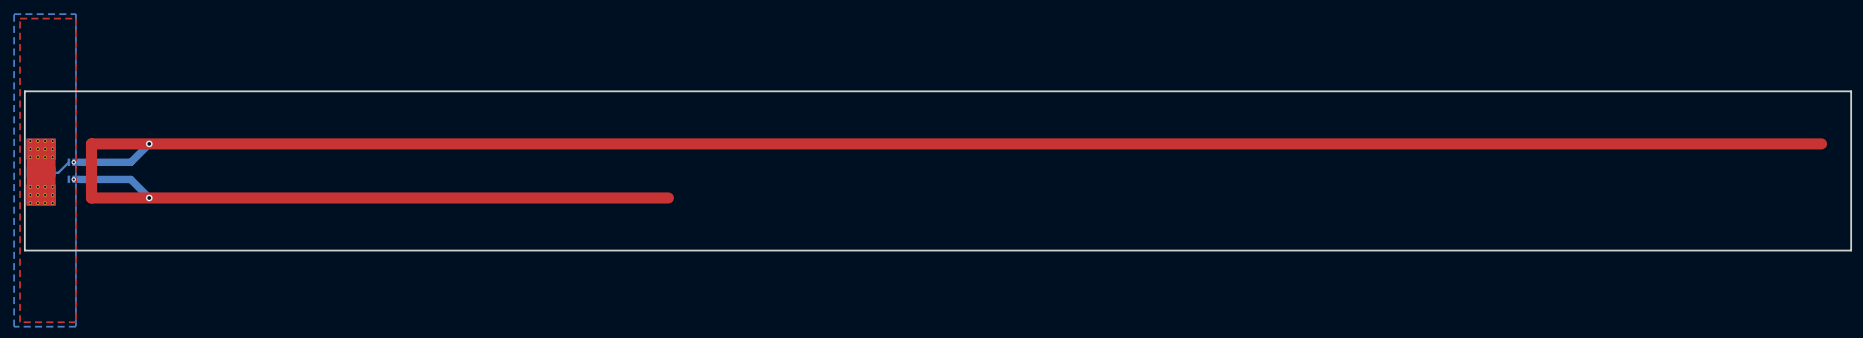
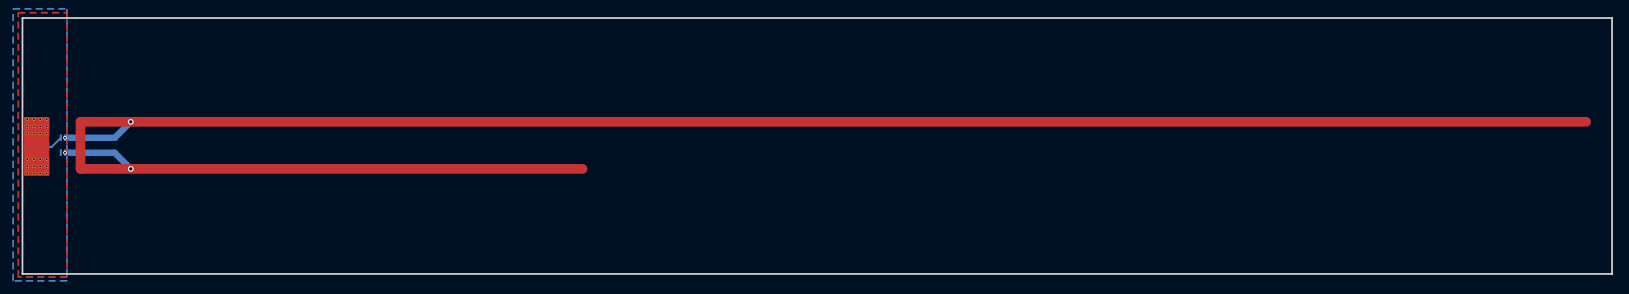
board edge: (24, 91) (1851, 91) -> (22, 76) (22, 18) (1612, 18) (1612, 76)
board edge: (24, 250) (1851, 250) -> (22, 214) (22, 273) (1612, 273) (1612, 214)

